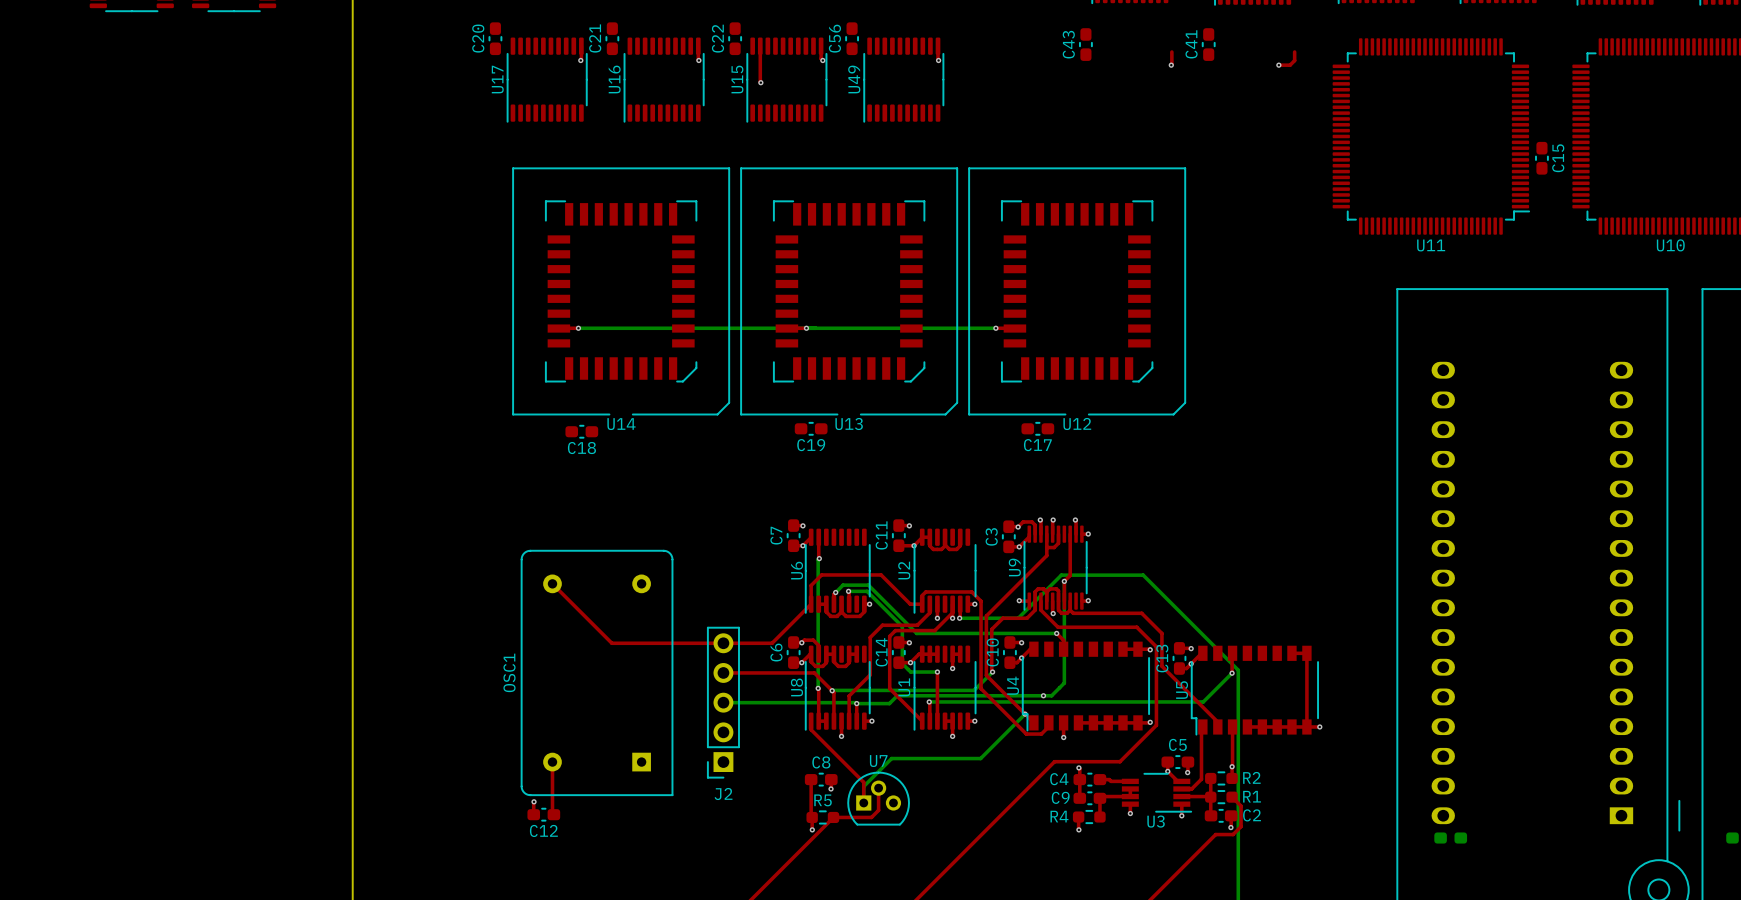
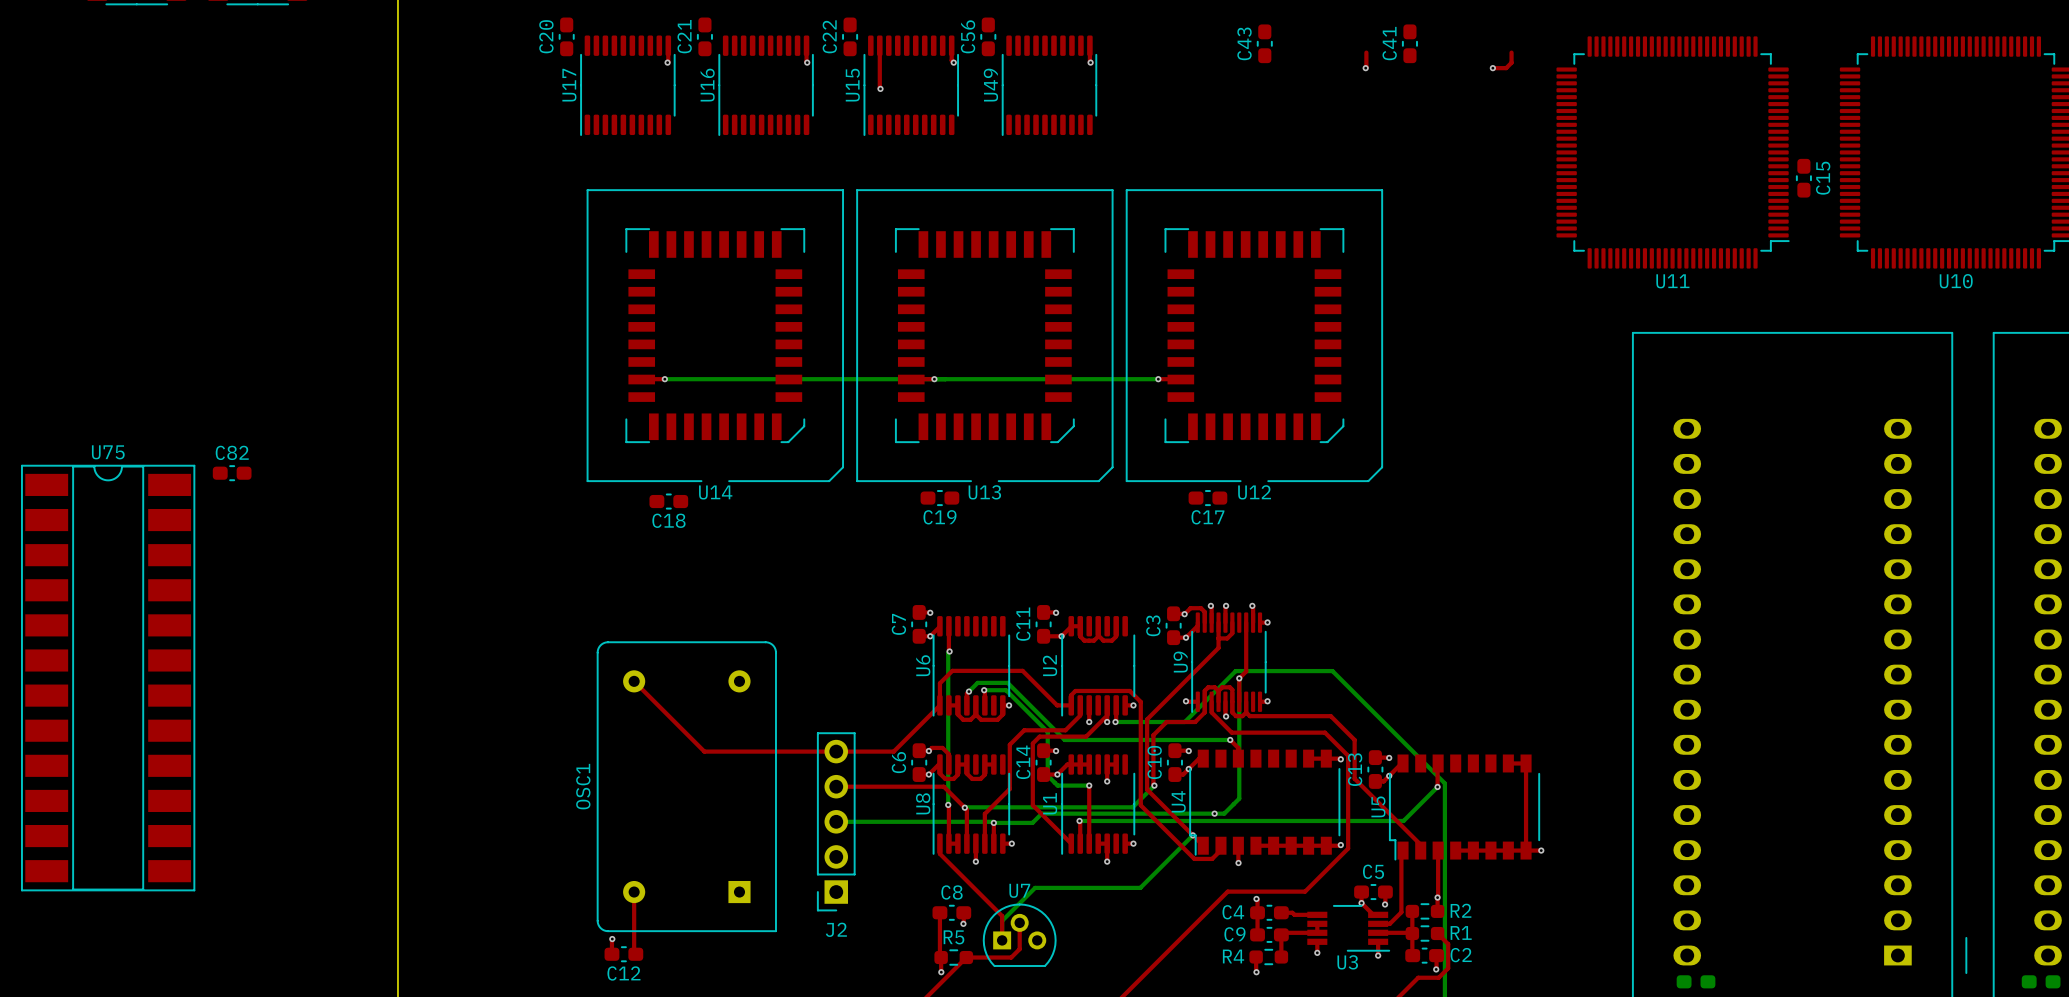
C82: none -> (232, 473)
U75: none -> (108, 678)

